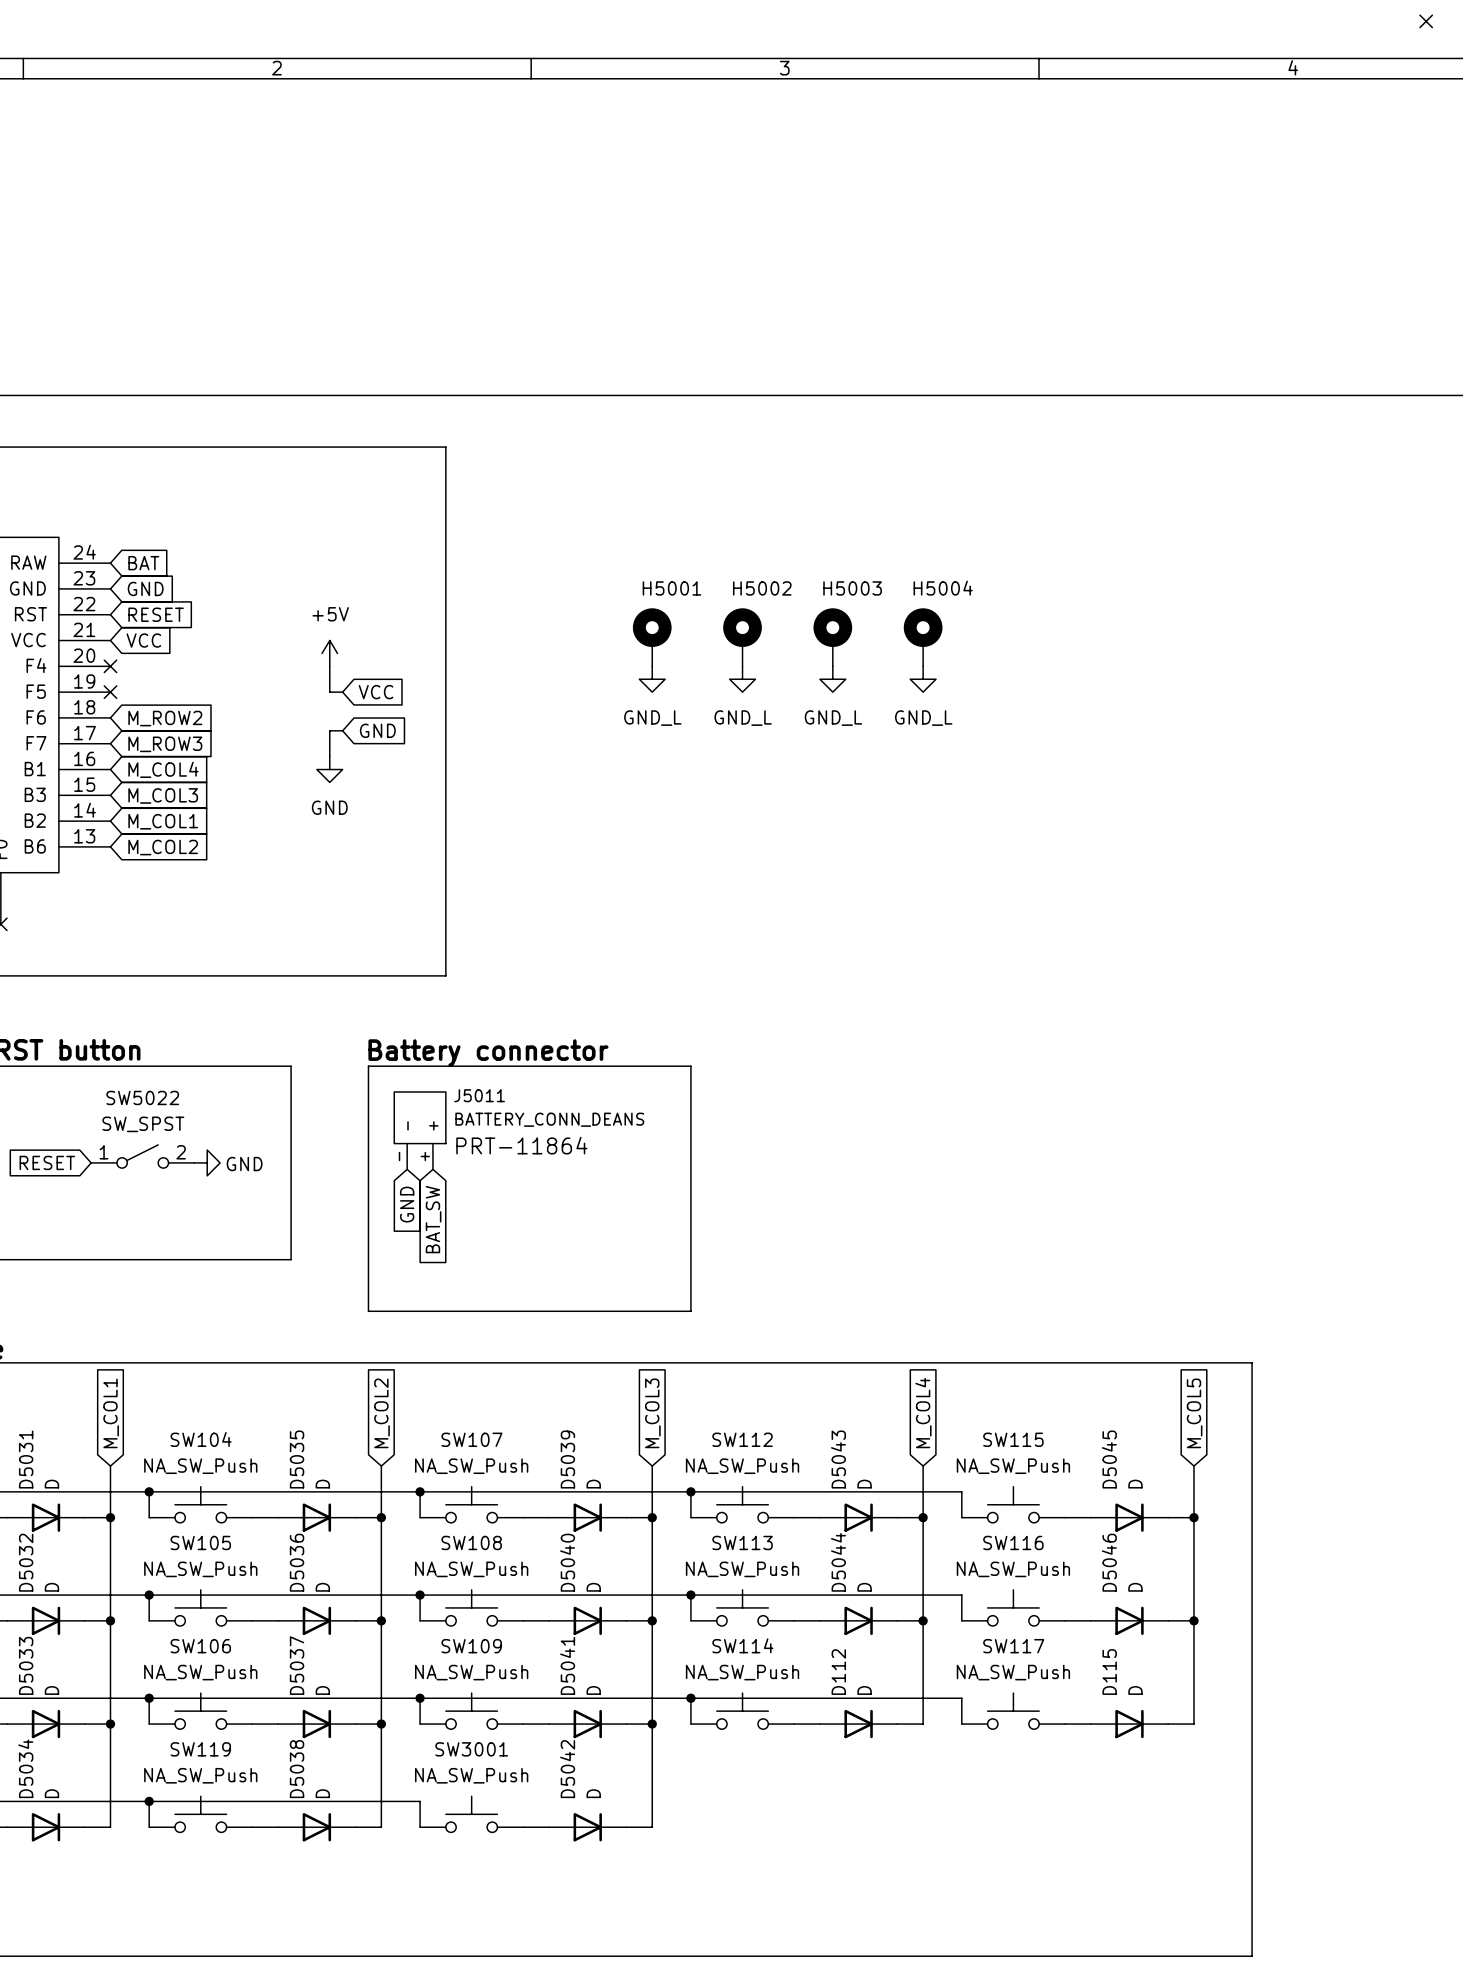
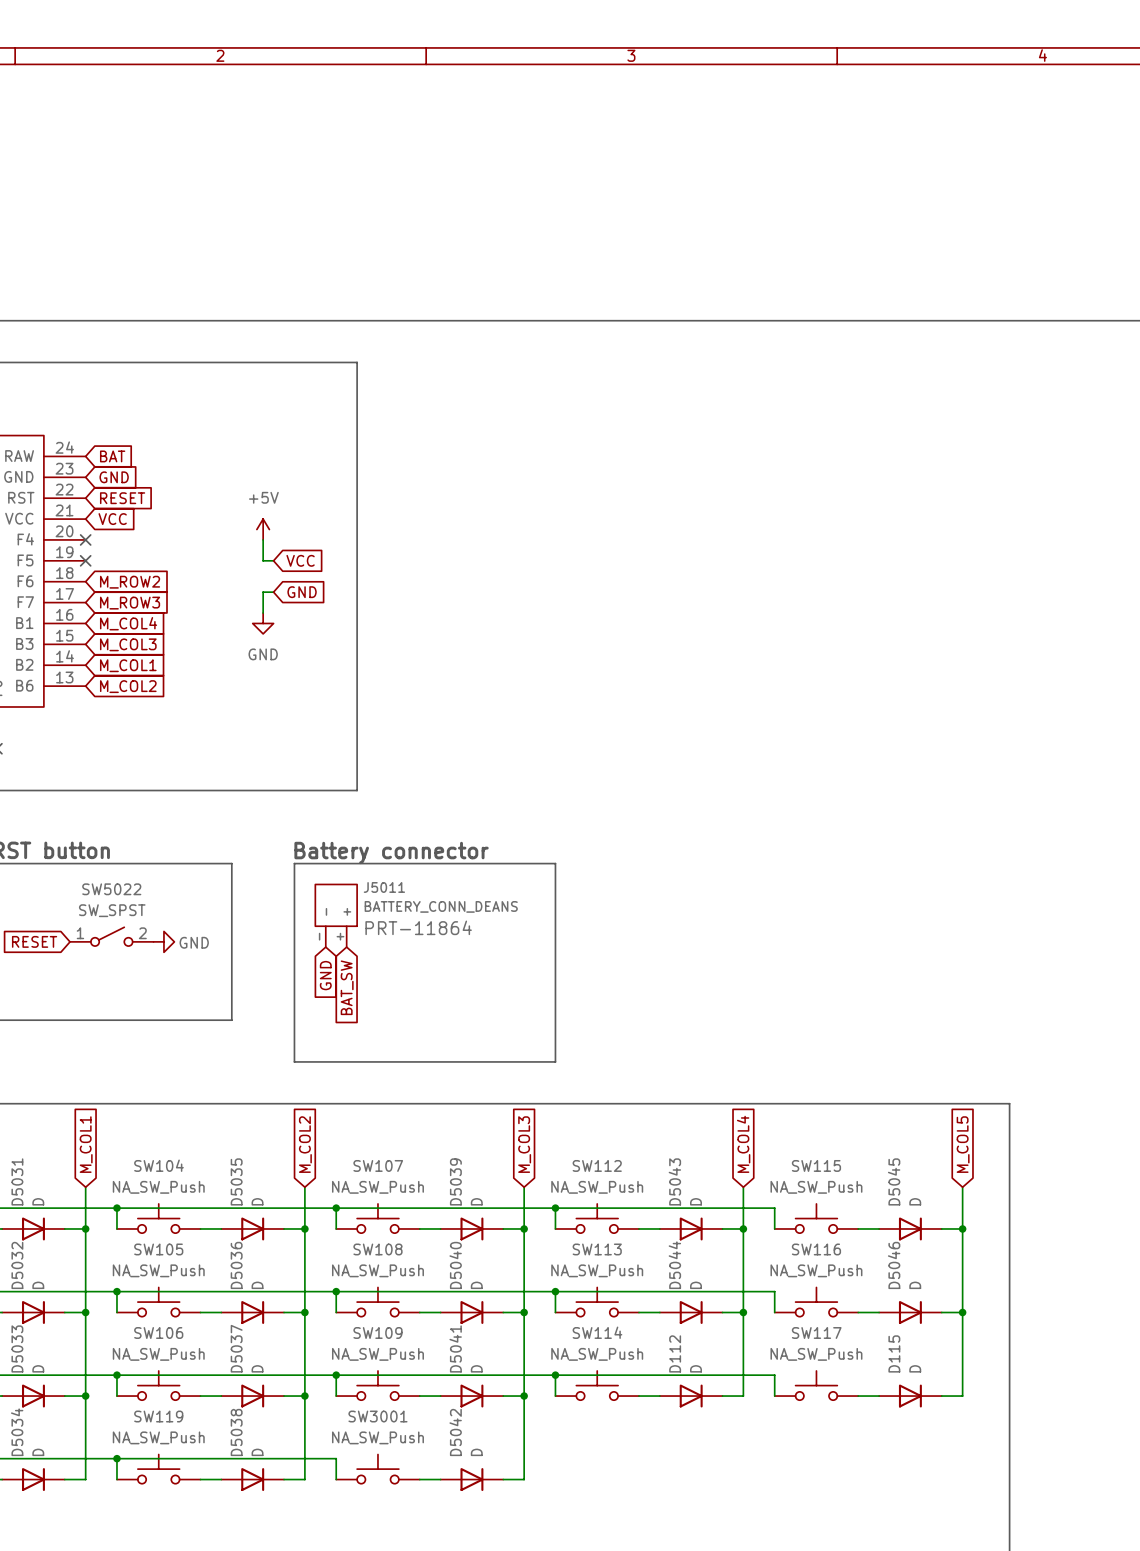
H5001: (652, 637) -> none
H5002: (742, 637) -> none
H5003: (832, 637) -> none
H5004: (923, 637) -> none
power symbol: GND_L (652, 679) -> none
power symbol: GND_L (742, 679) -> none
power symbol: GND_L (832, 679) -> none
power symbol: GND_L (923, 679) -> none

